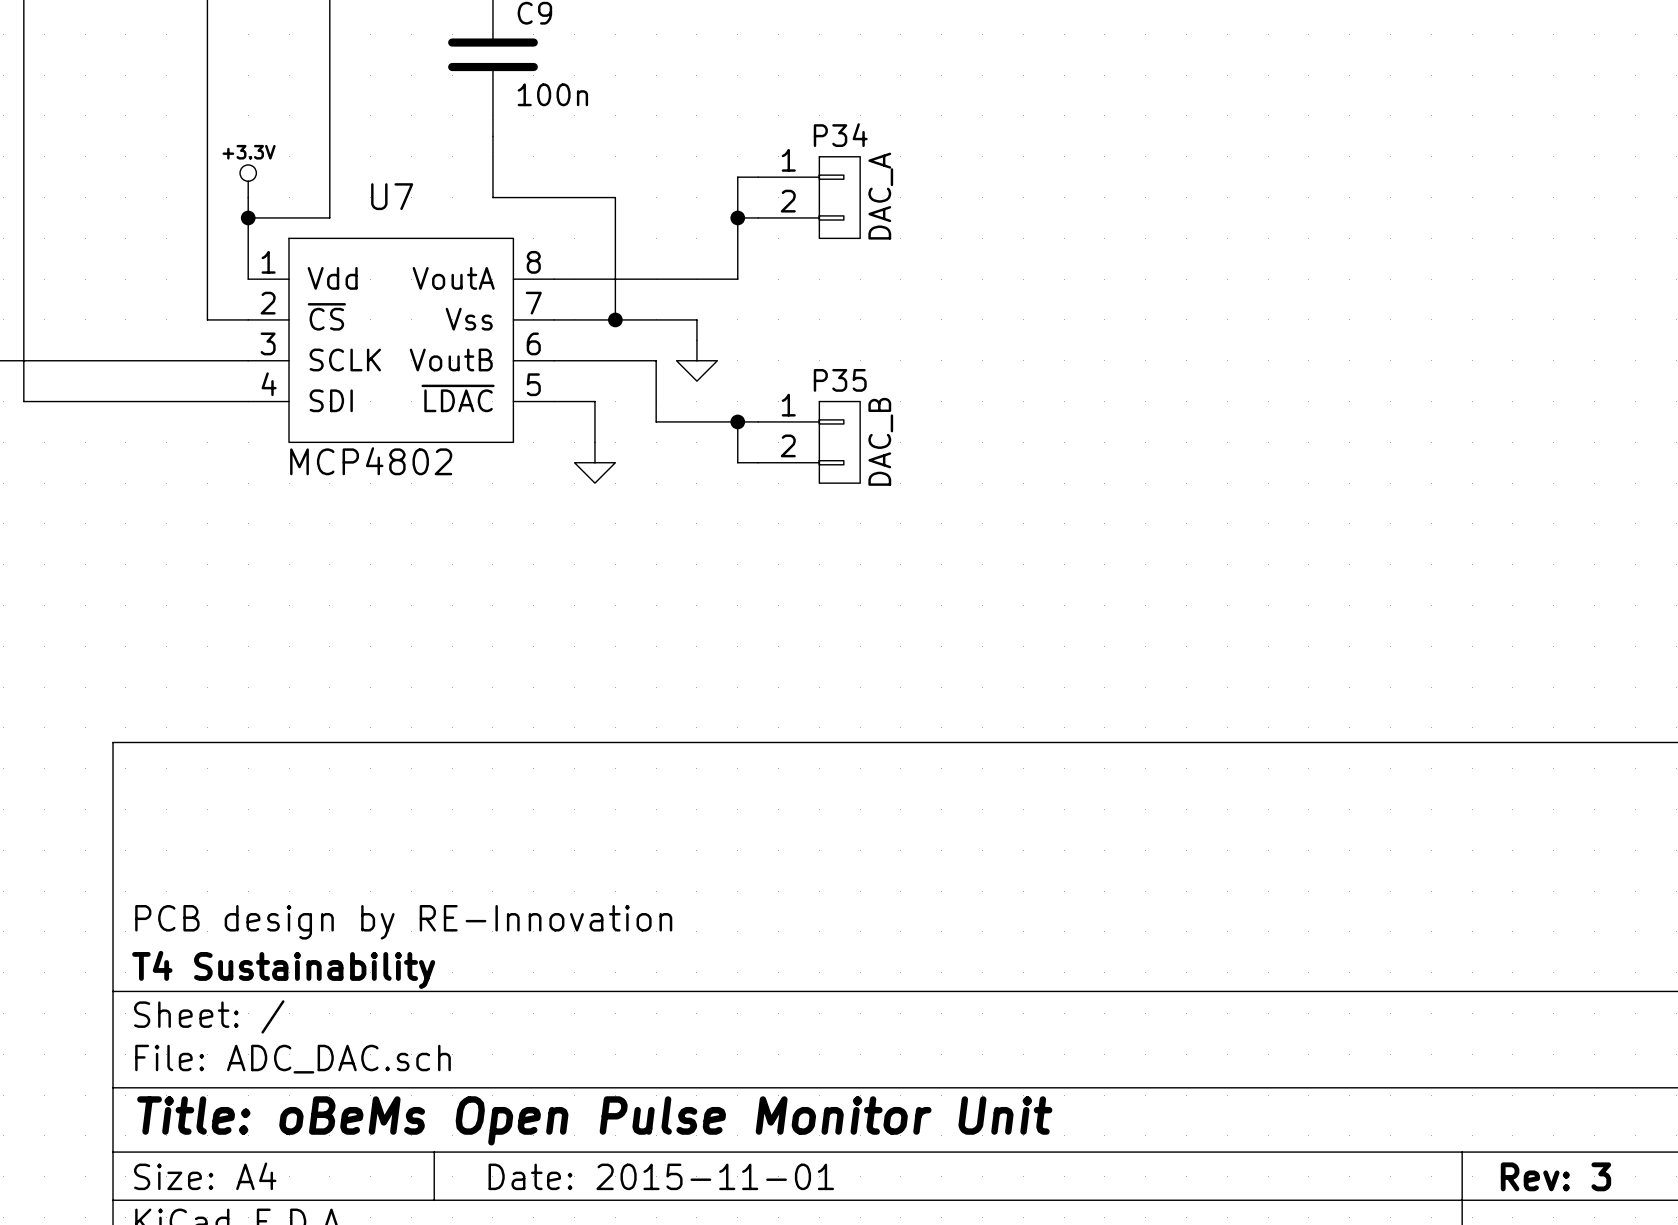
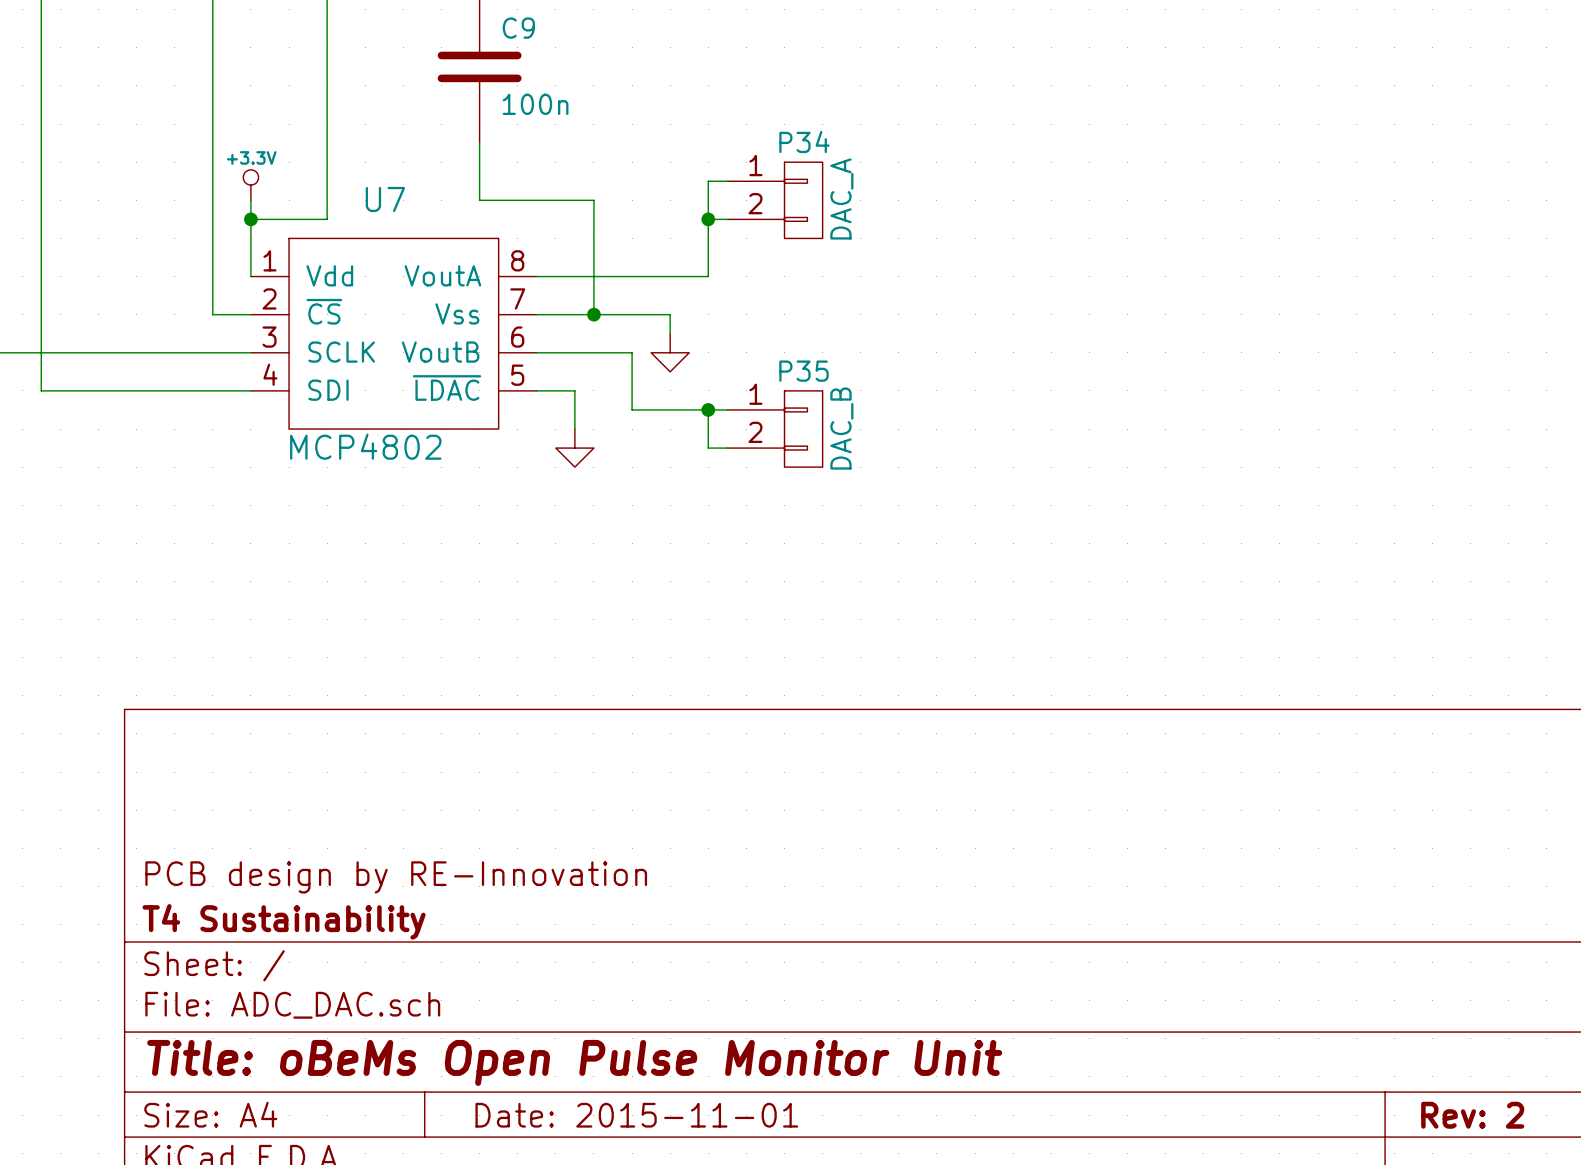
title block: Rev: 3 (1555, 1176) -> Rev: 2 (1472, 1115)

